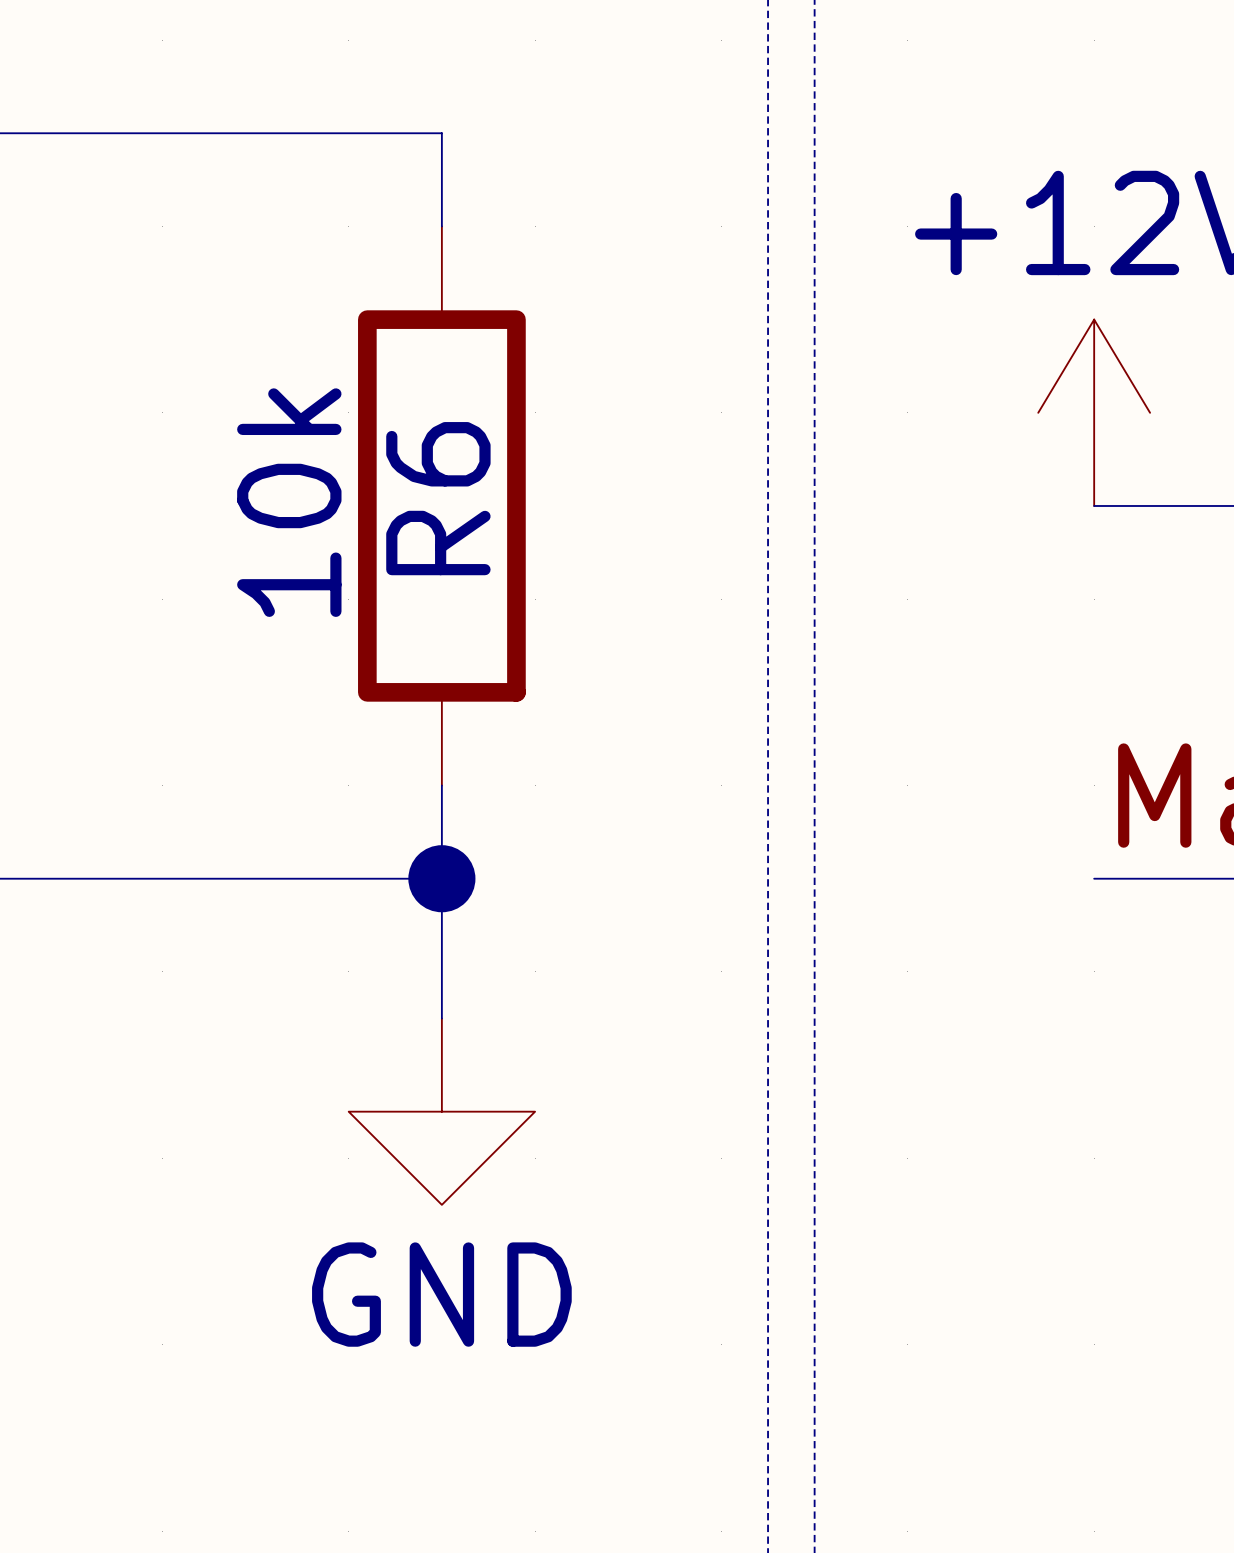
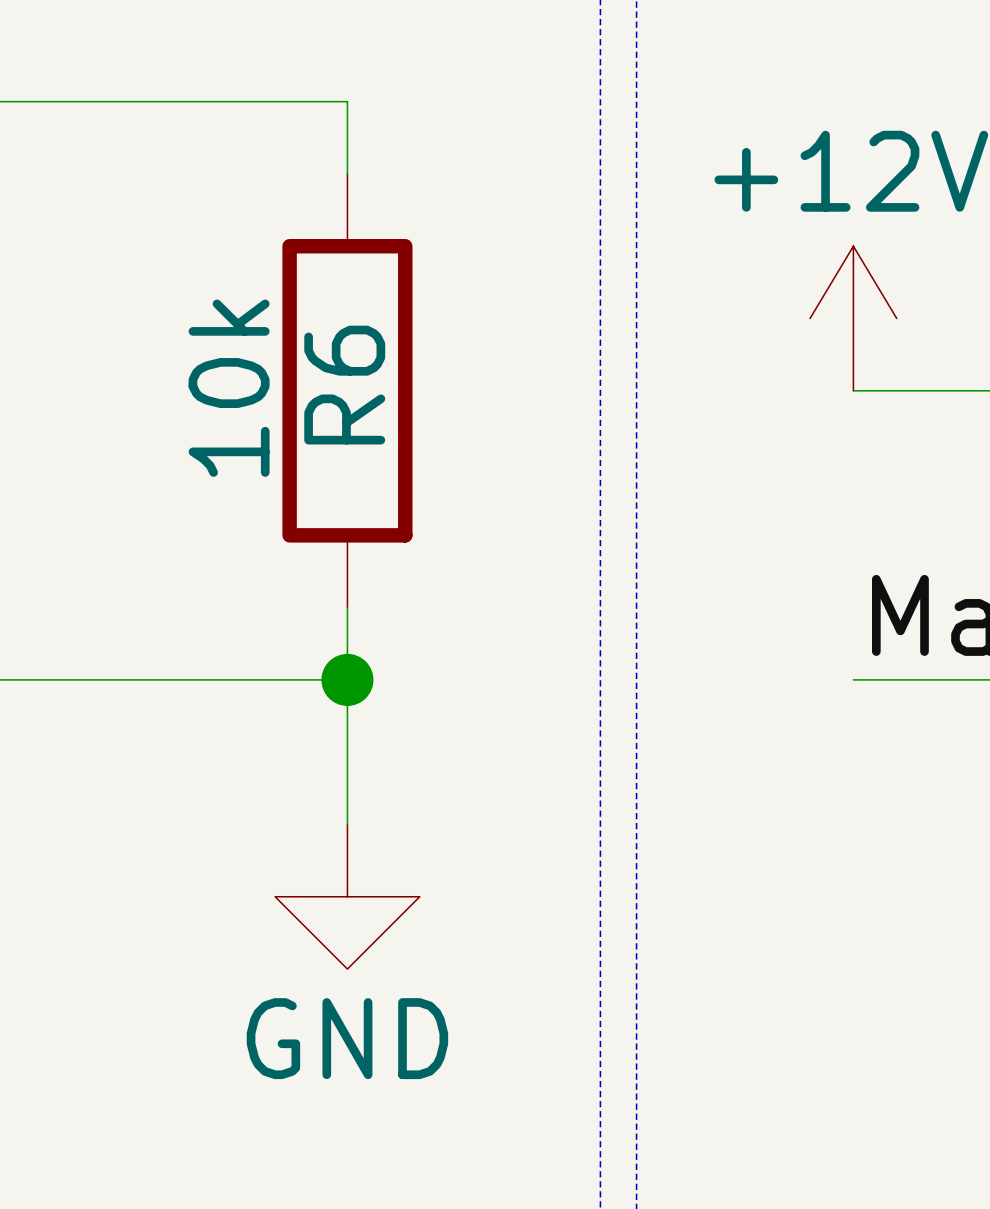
power symbol position: GND (441, 1111) -> GND (347, 896)

